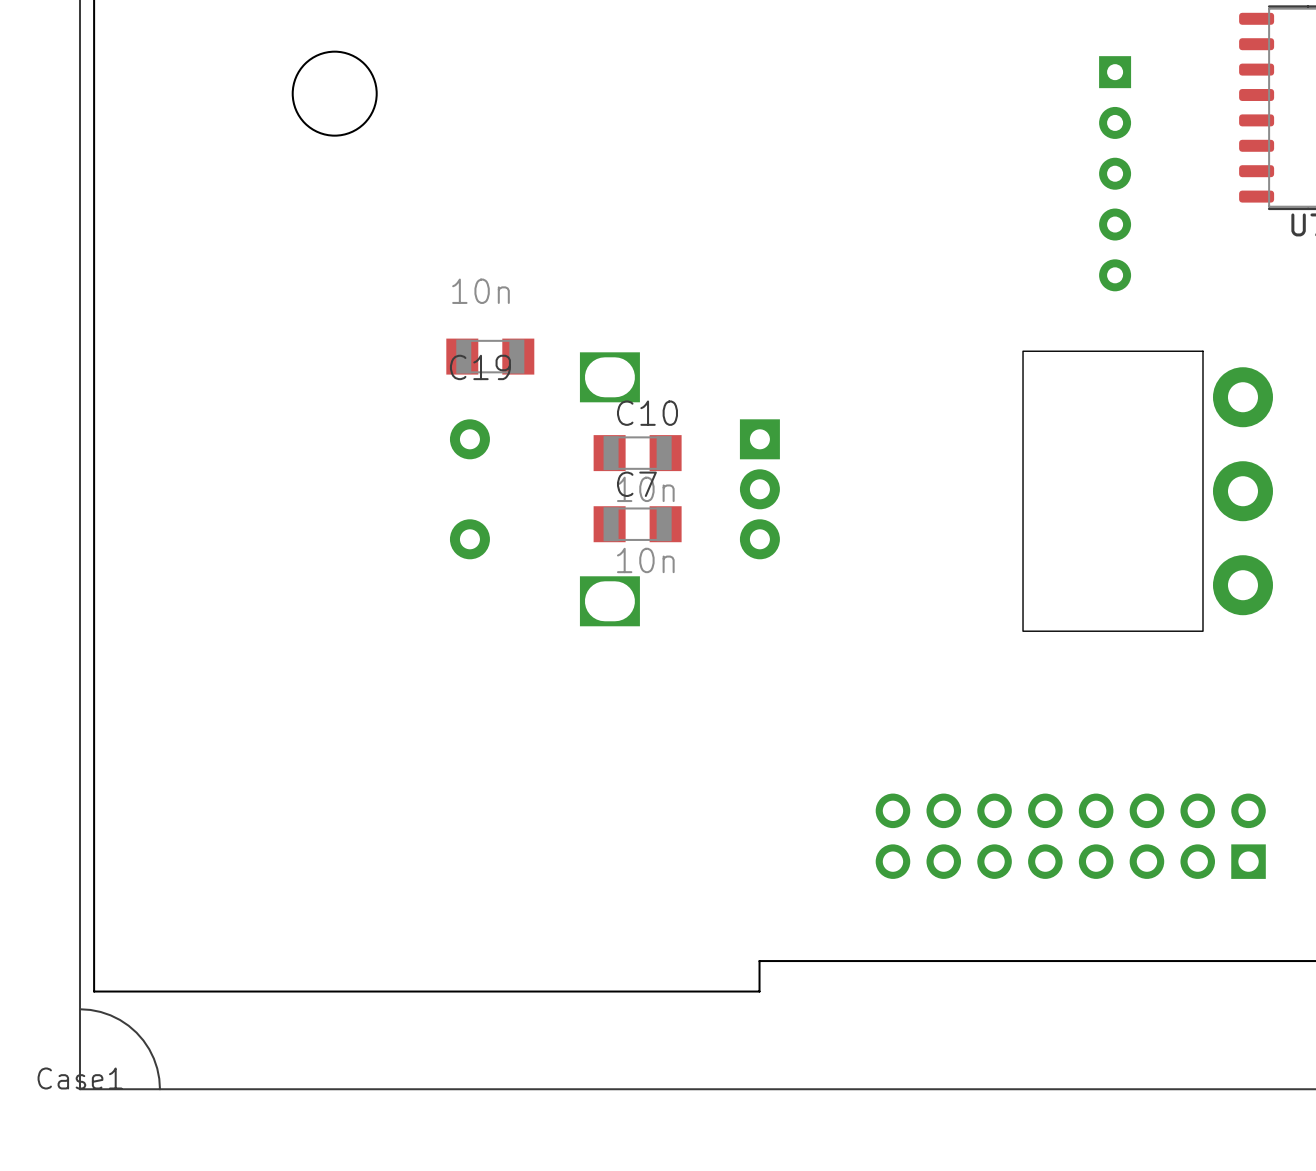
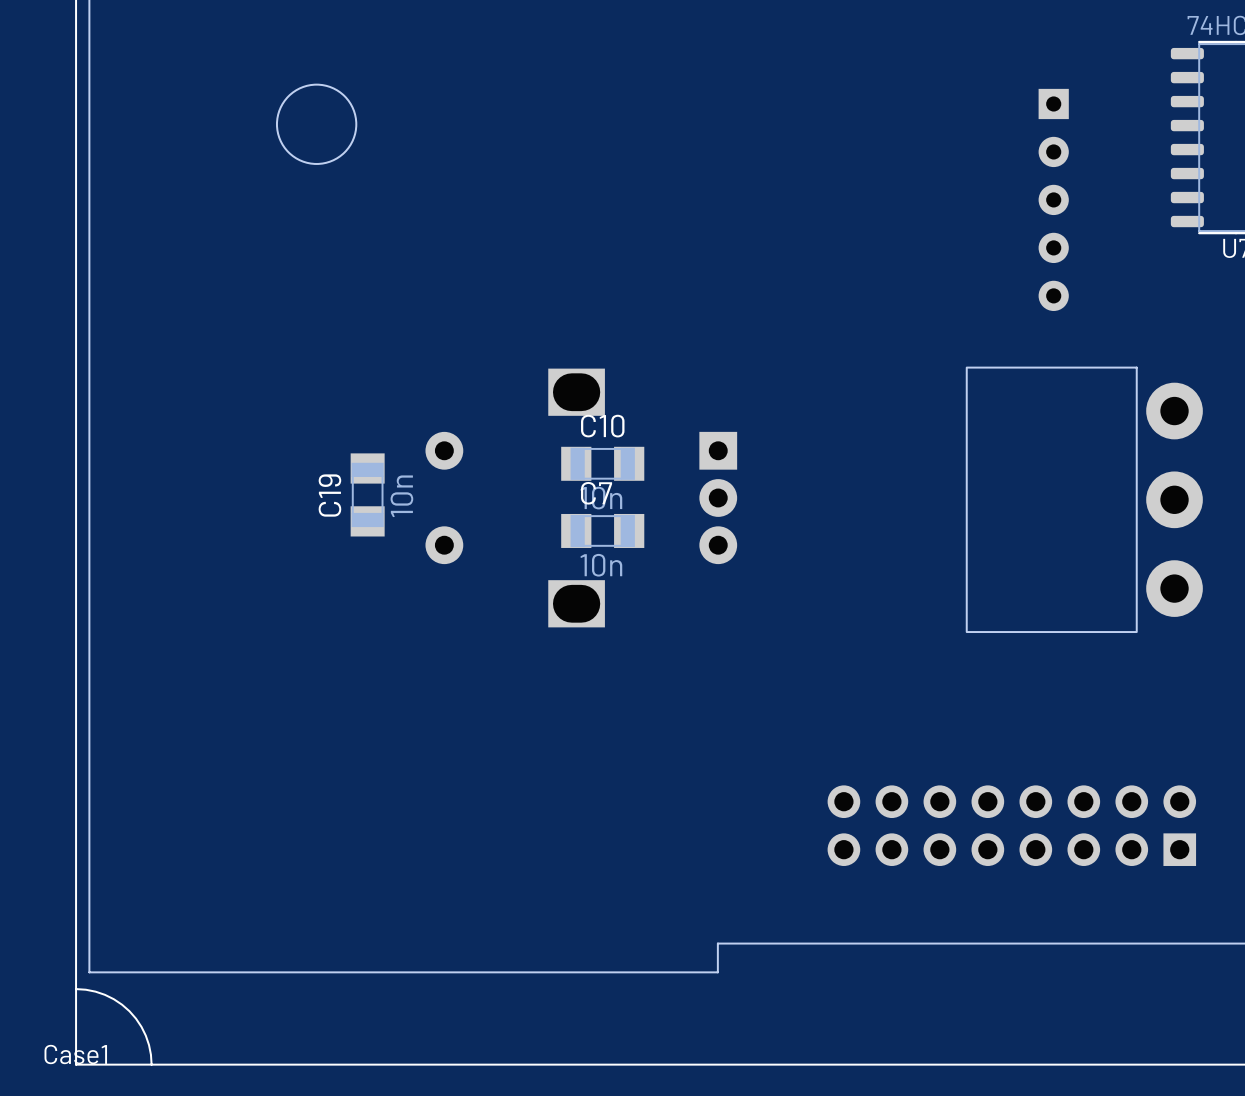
C19 rotation: 0° (490, 356) -> 90° clockwise (367, 494)
C19 position: (490, 356) -> (367, 494)

